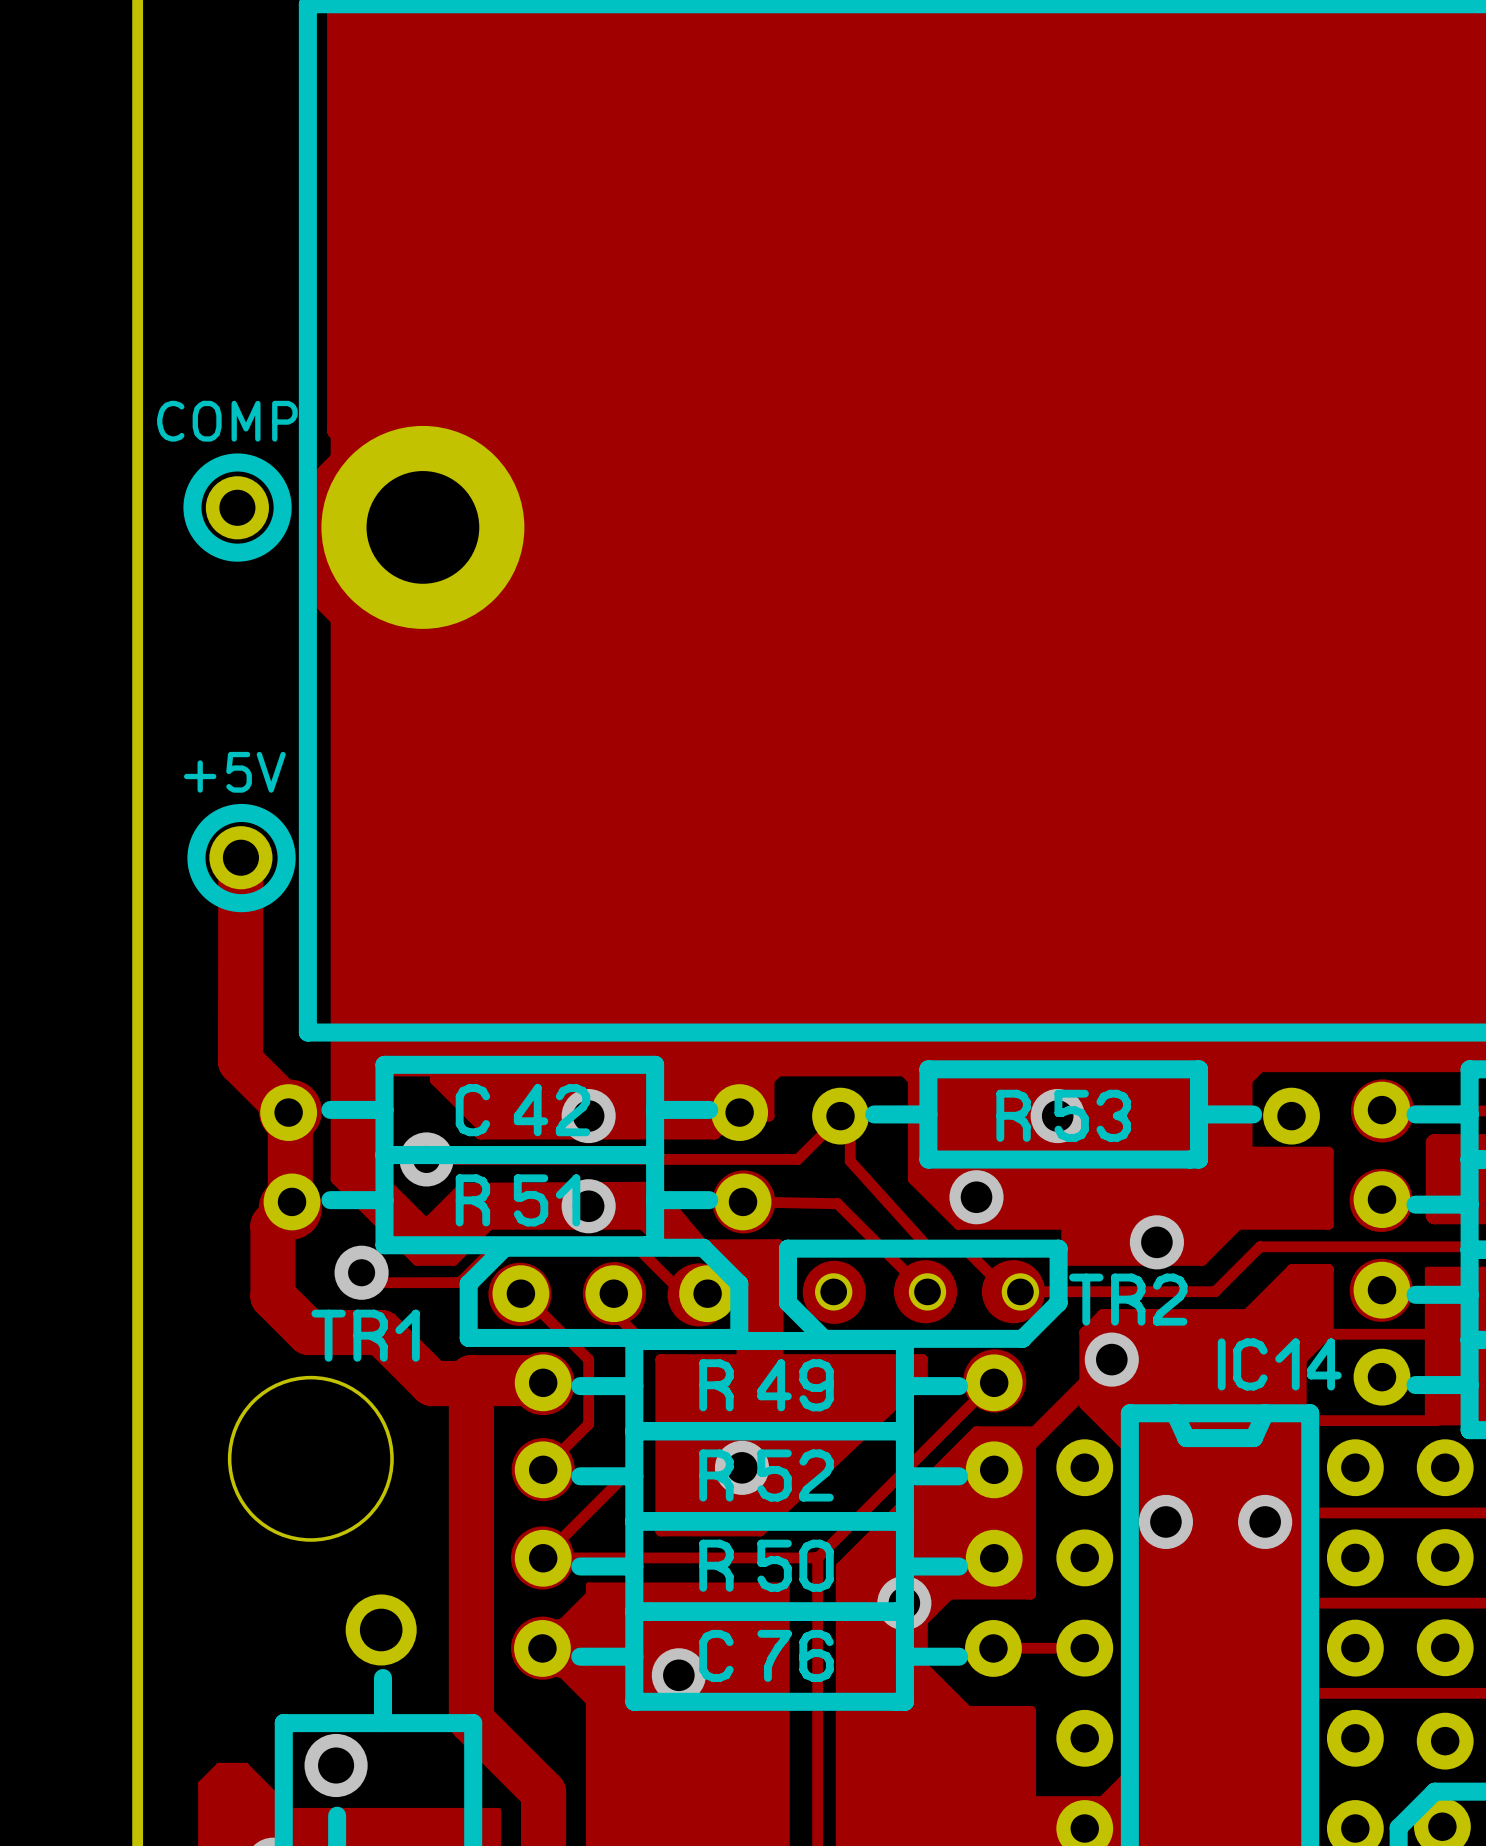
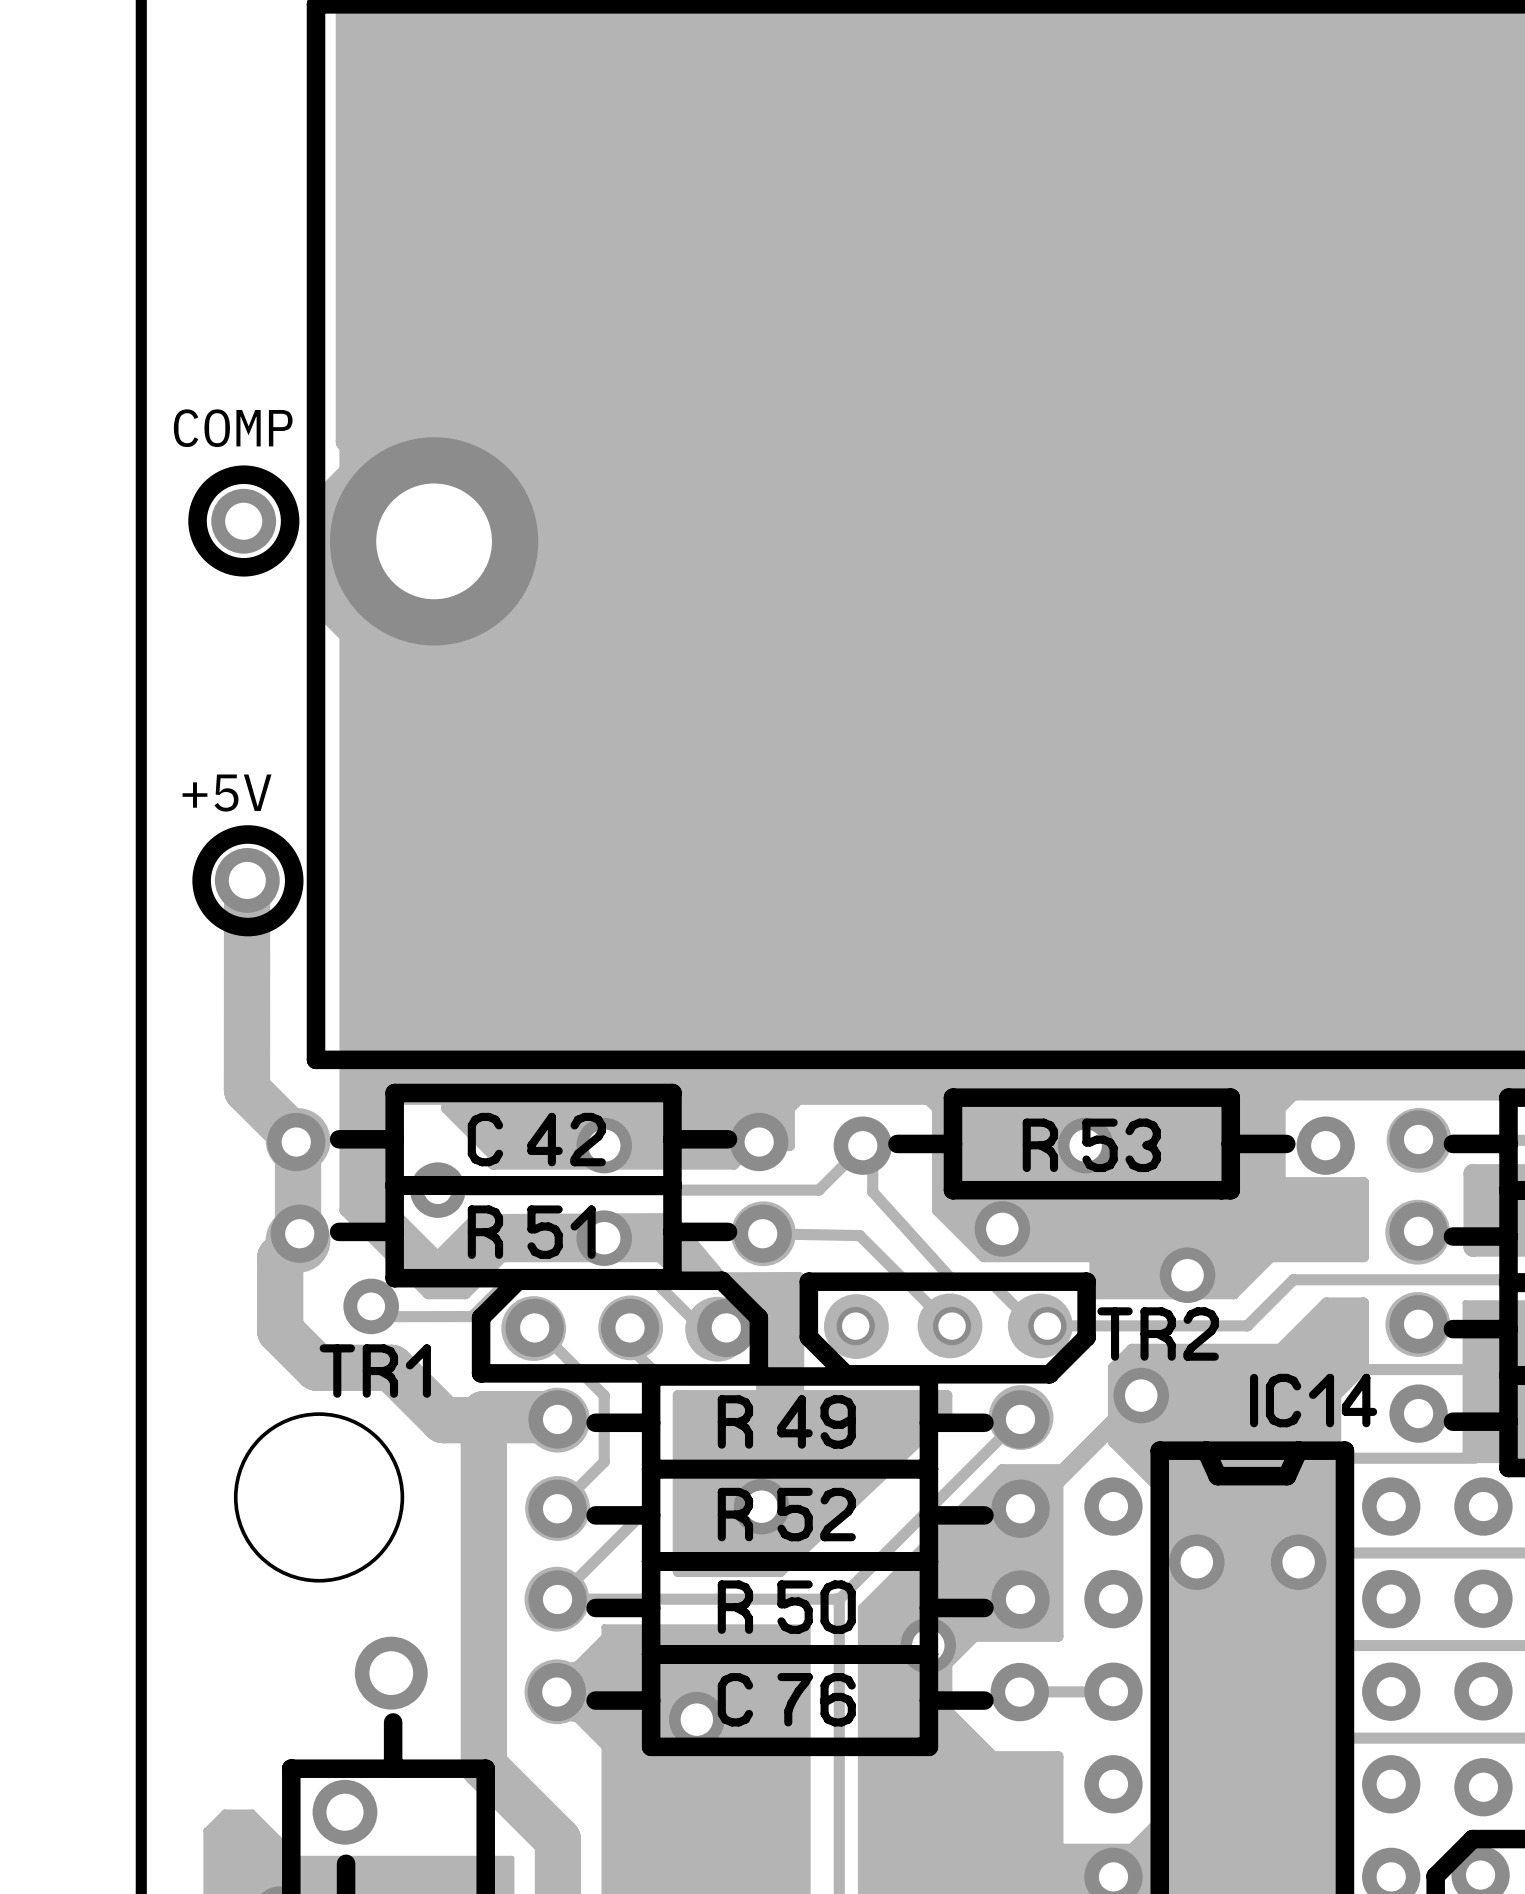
part text position: COMP (227, 421) -> COMP (233, 428)

